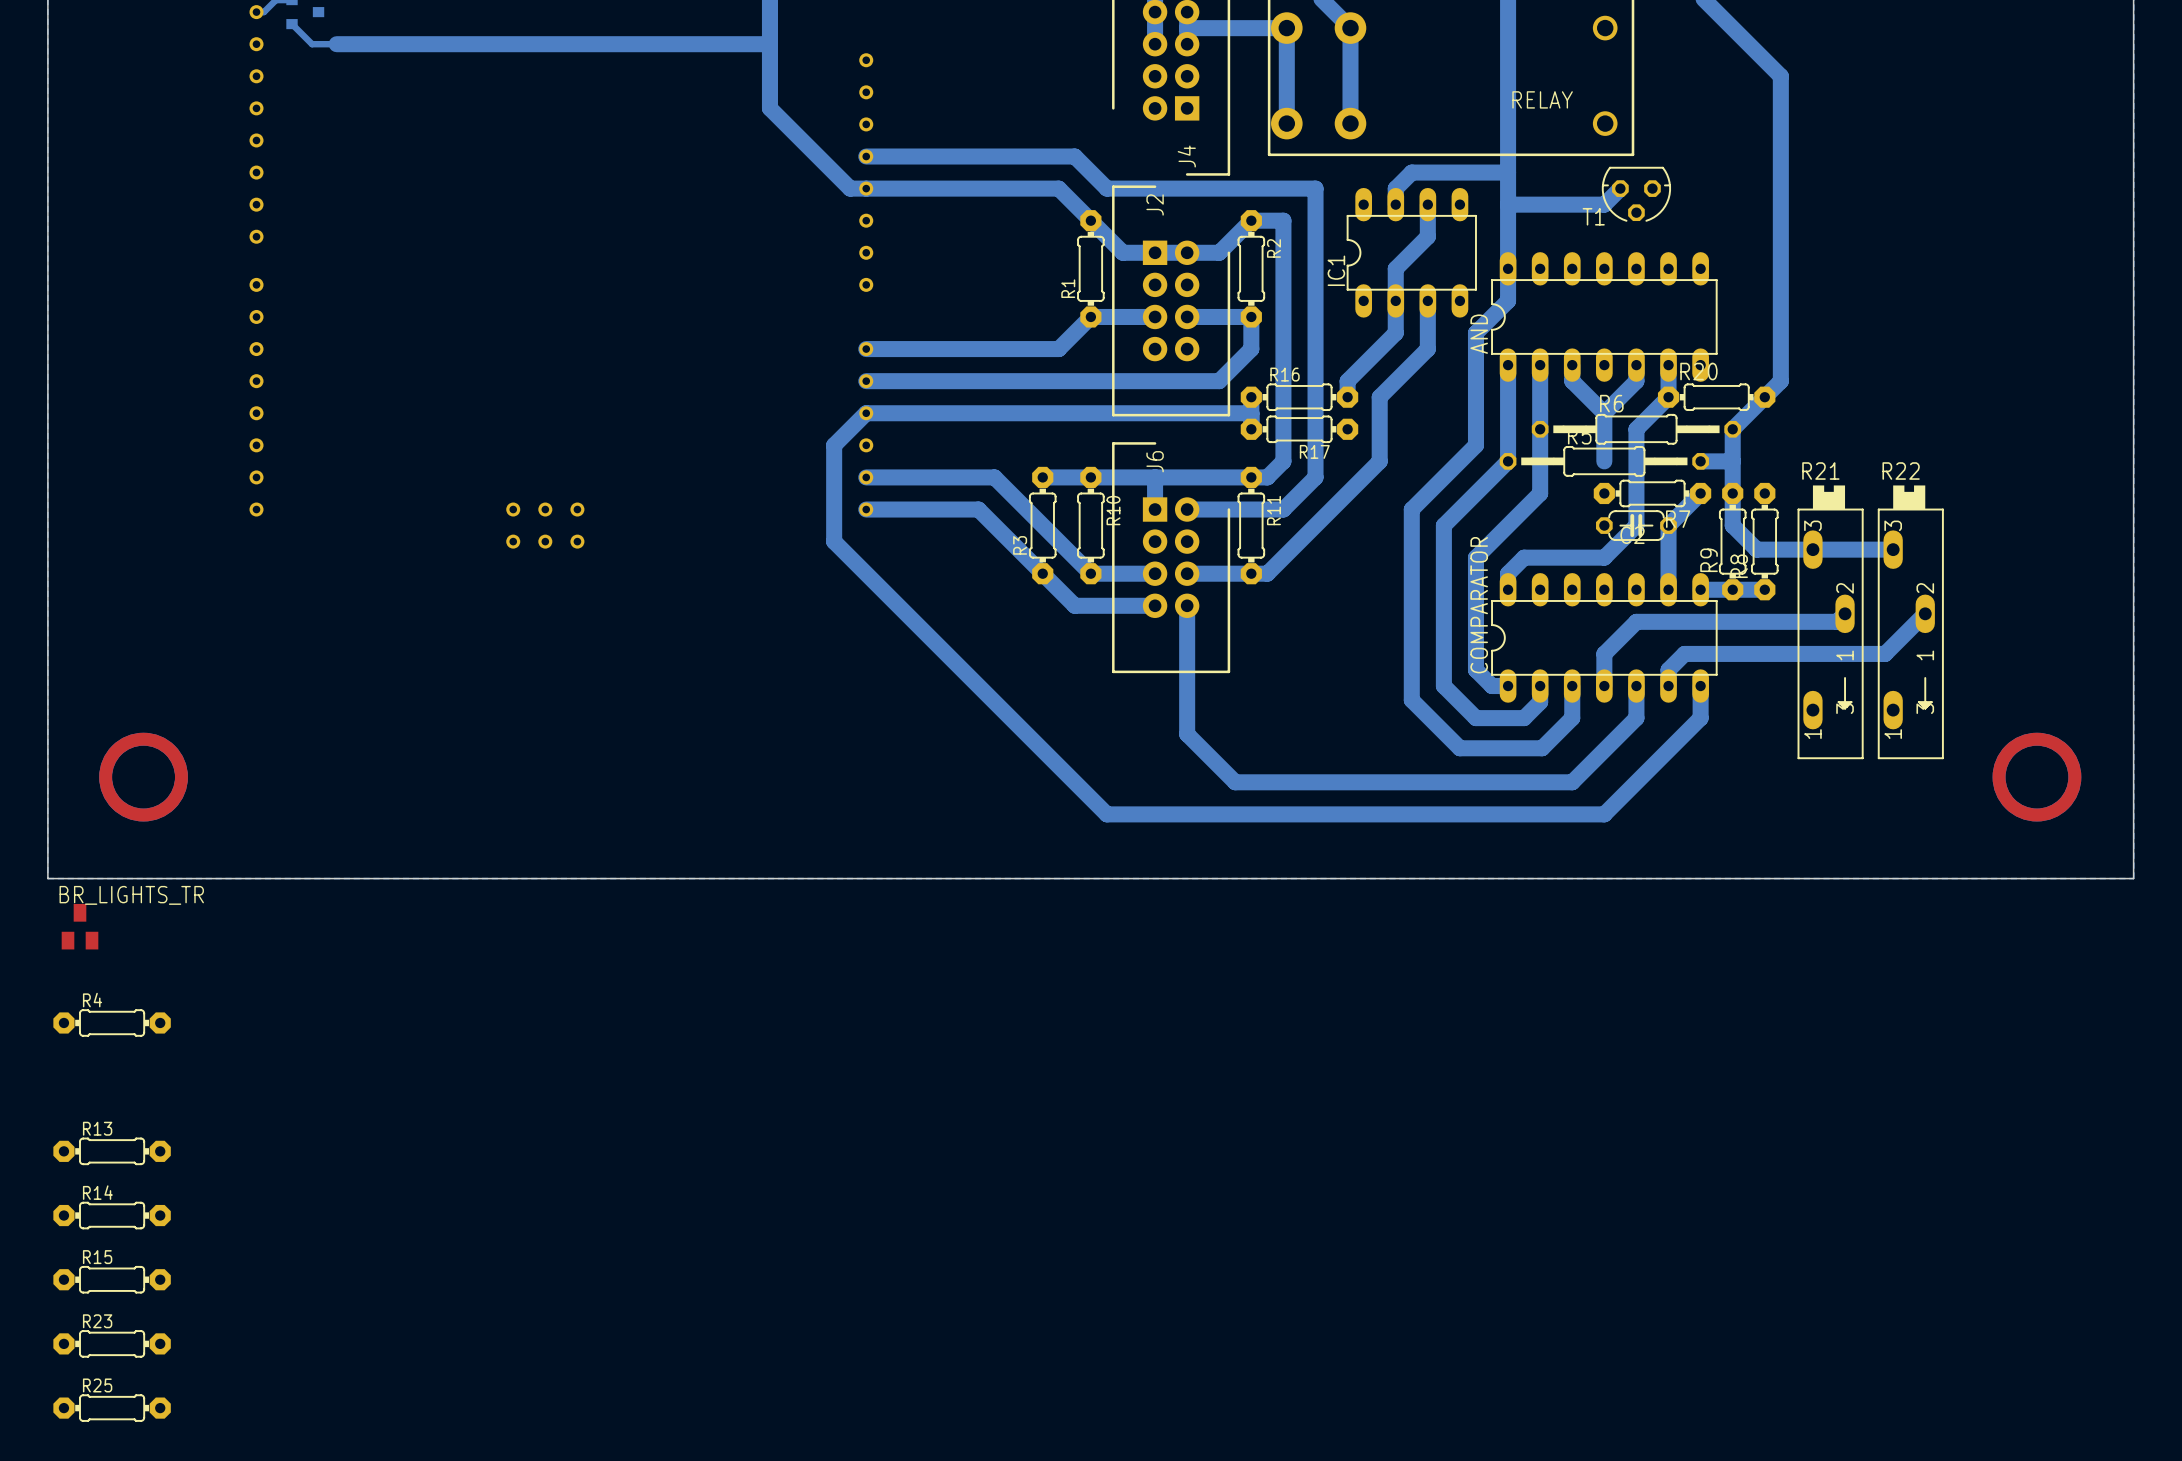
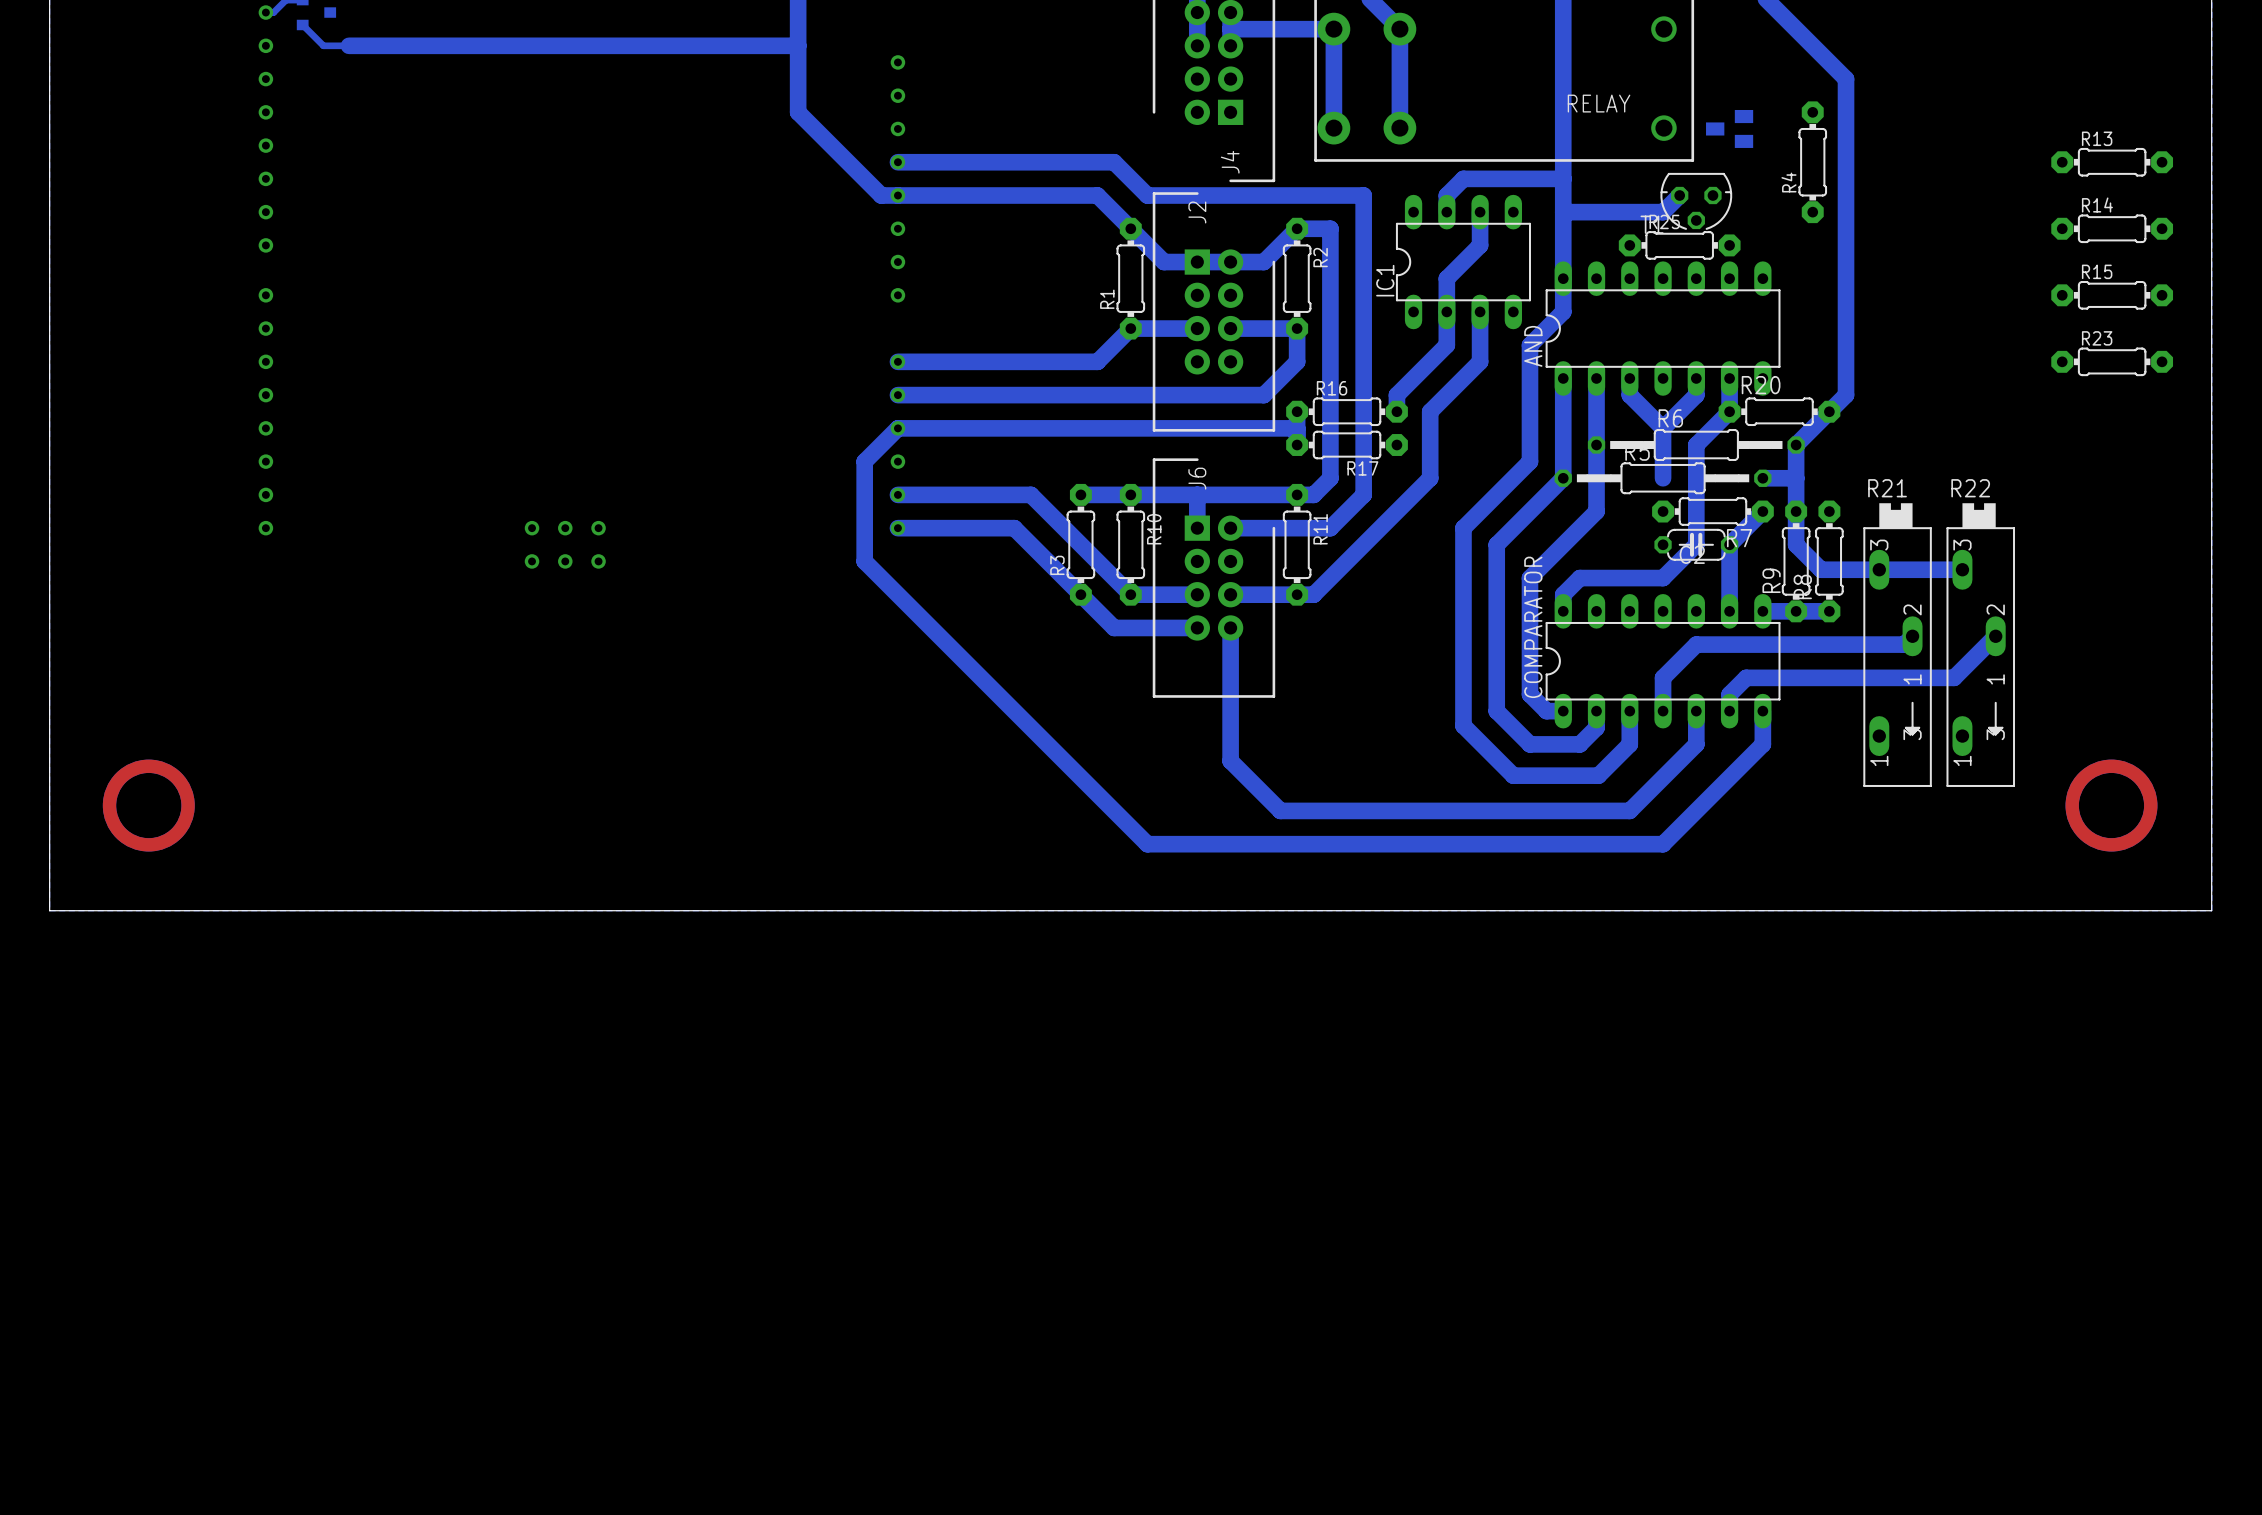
part: none -> (1729, 128)
BR_LIGHTS_TR: (80, 926) -> none
R4 name position: R4 (92, 1000) -> R4 (1788, 182)
R4 rotation: 0° (112, 1022) -> 90° clockwise (1812, 162)
R4 position: (112, 1022) -> (1812, 162)
R13 position: (112, 1151) -> (2112, 162)
R14 position: (112, 1215) -> (2112, 228)
R15 position: (112, 1279) -> (2112, 295)
R23 position: (112, 1343) -> (2112, 361)
R25 position: (112, 1408) -> (1679, 245)

